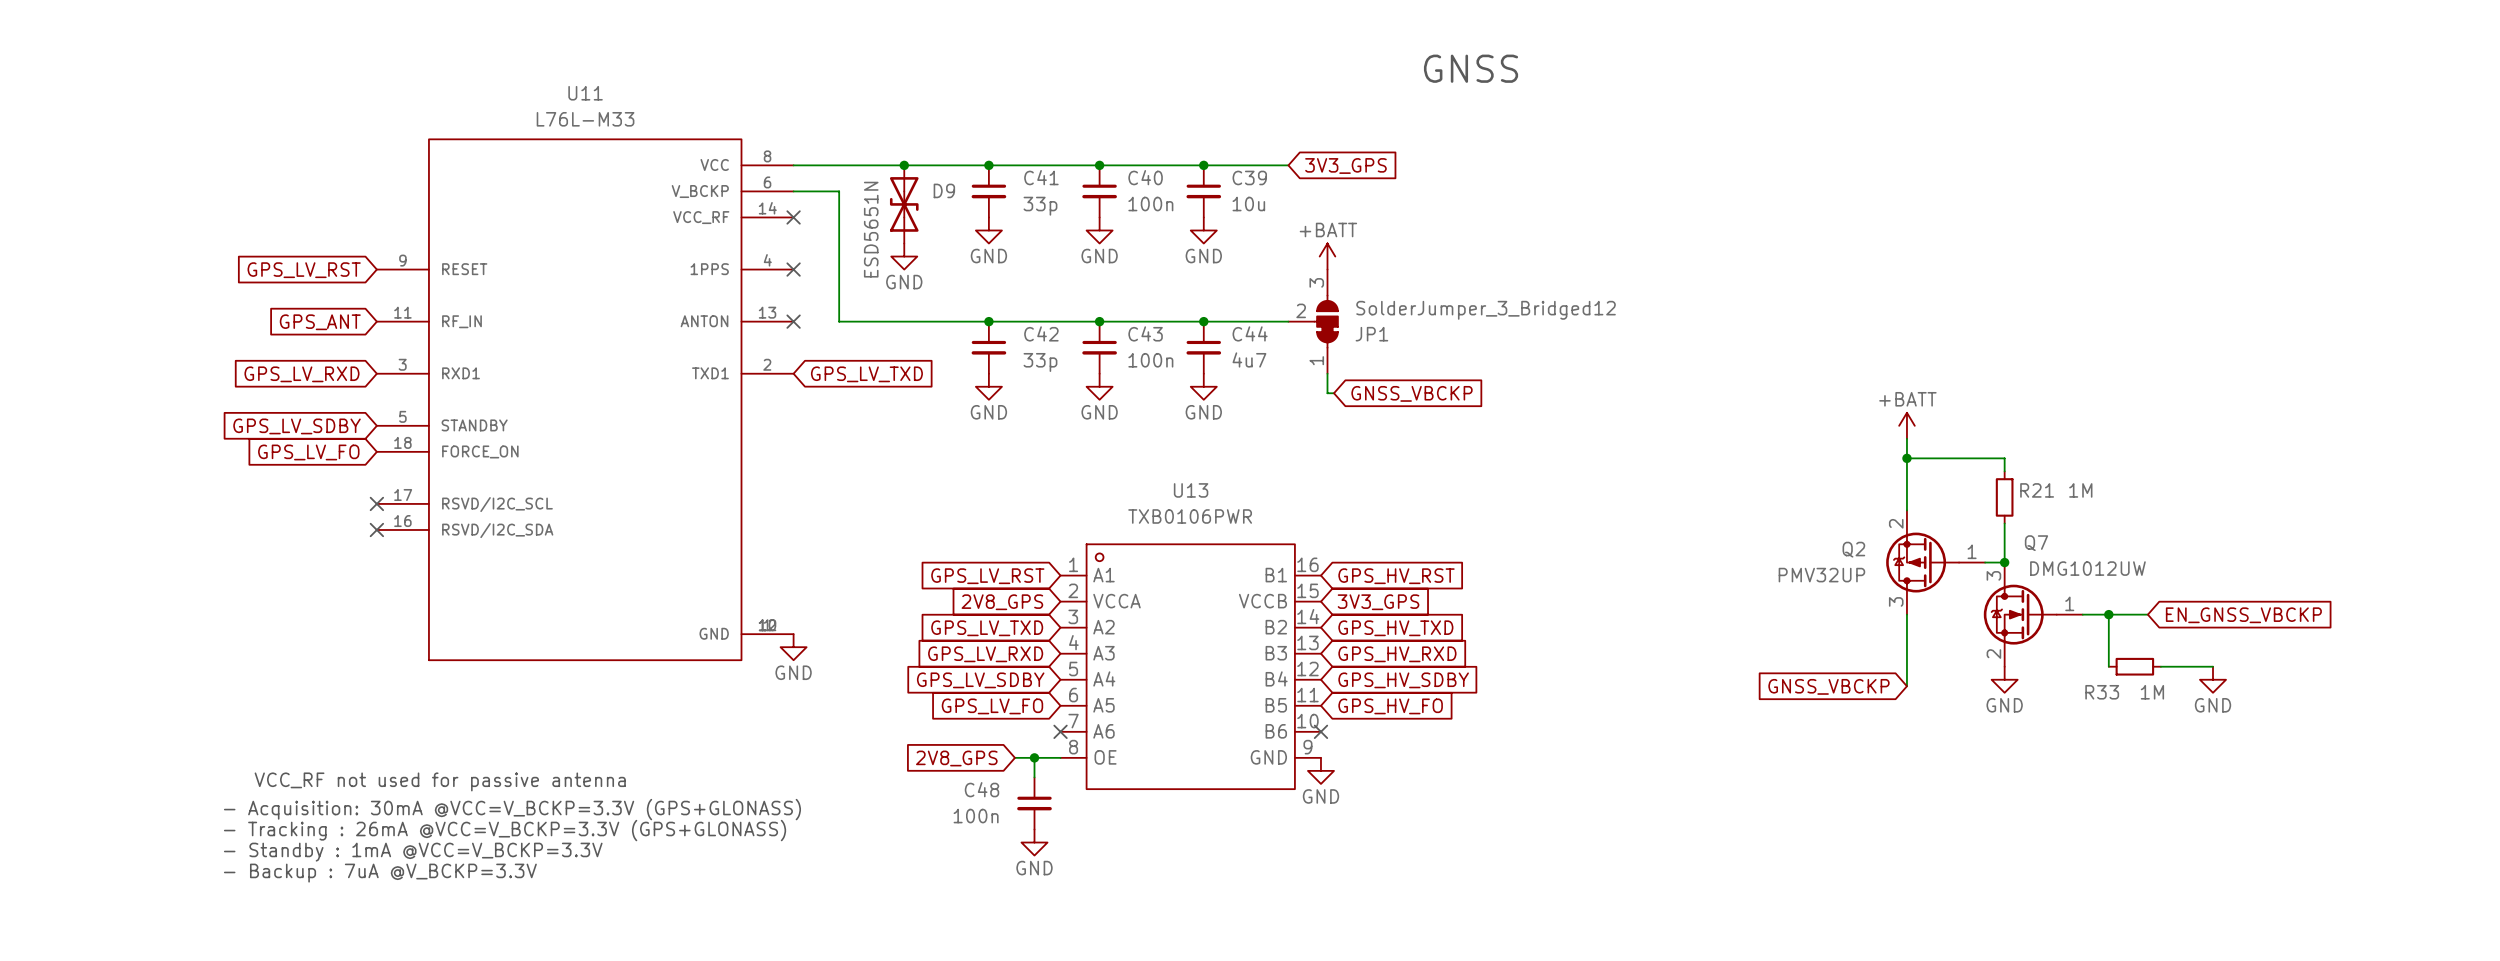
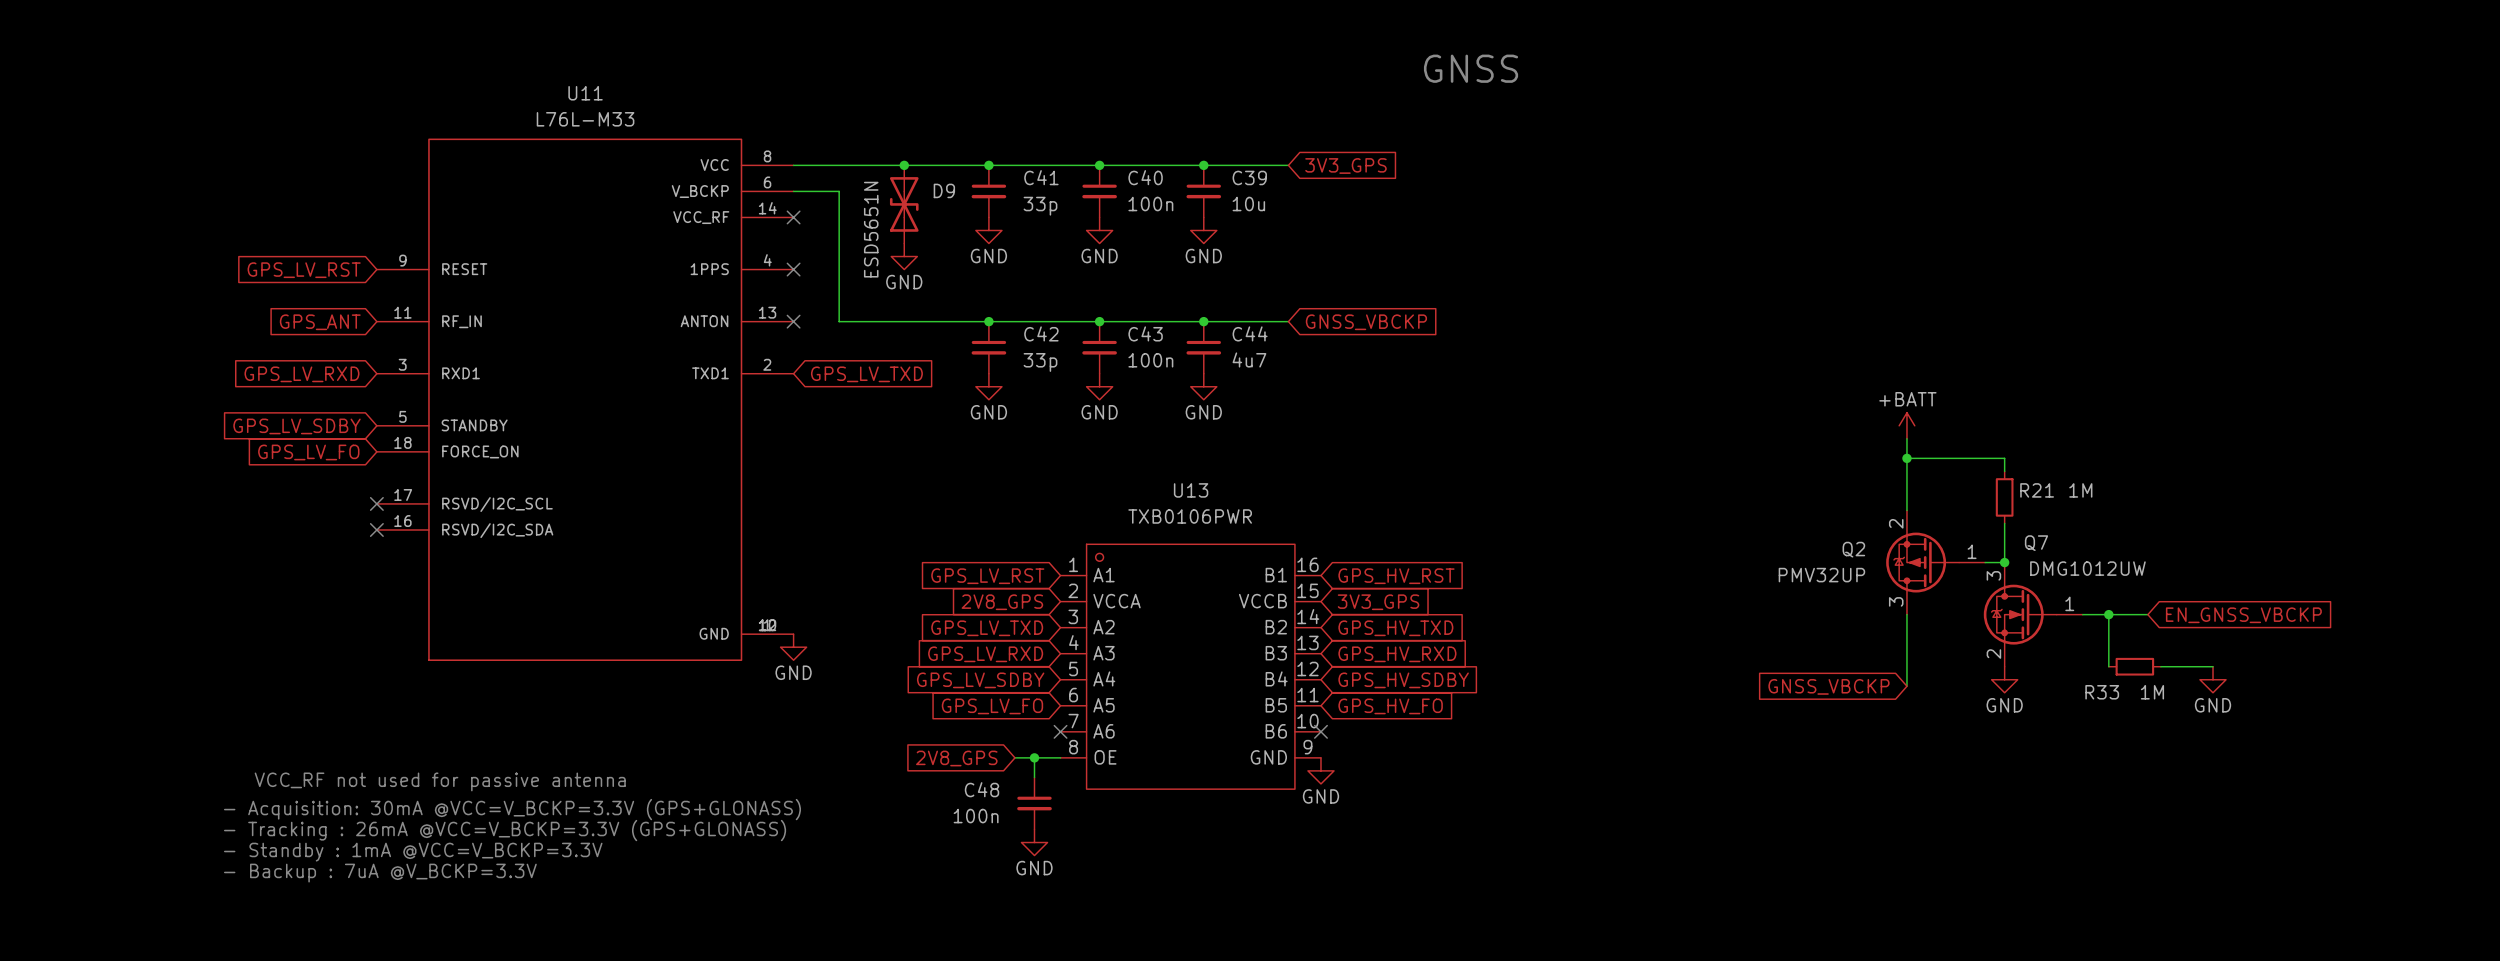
power symbol: +BATT (1327, 256) -> none
JP1: SolderJumper_3_Bridged12 (1313, 321) -> none
wire: (1327, 373) (1327, 393) (1334, 393) -> none
global label position: GNSS_VBCKP (1412, 393) -> GNSS_VBCKP (1366, 322)

